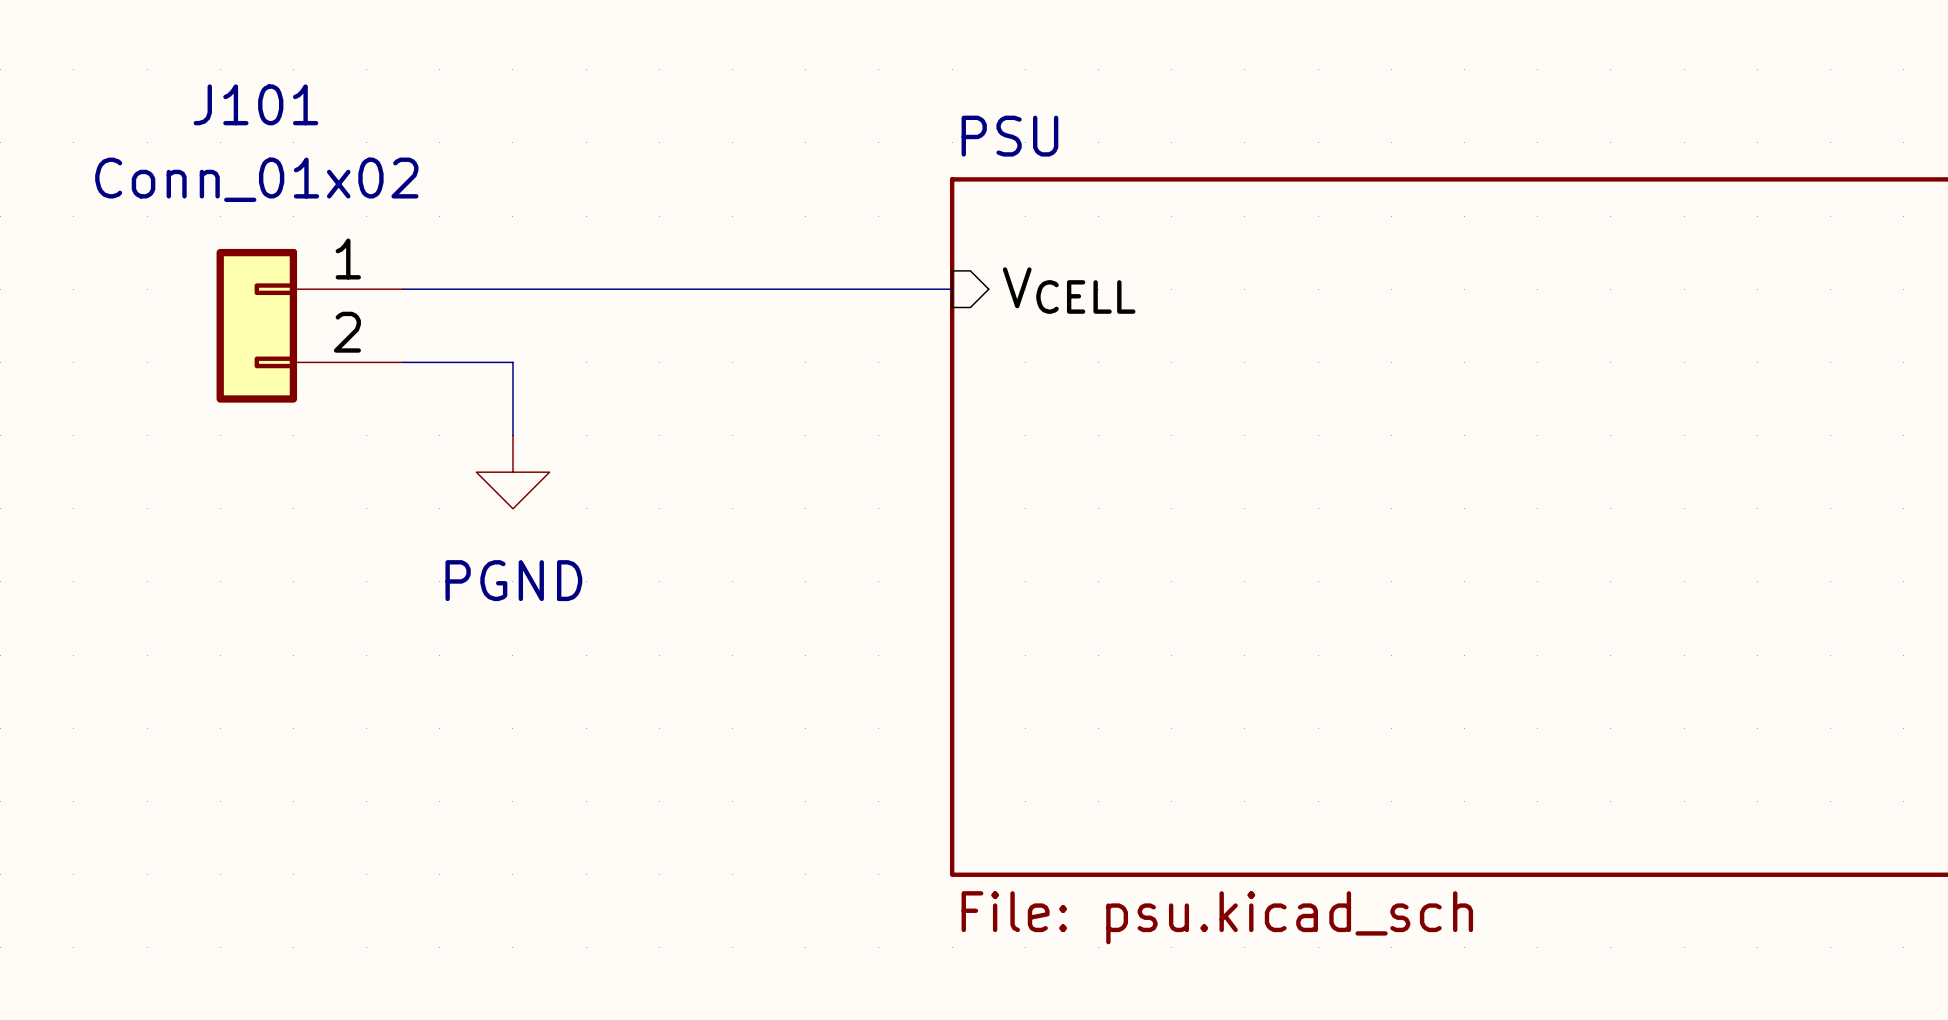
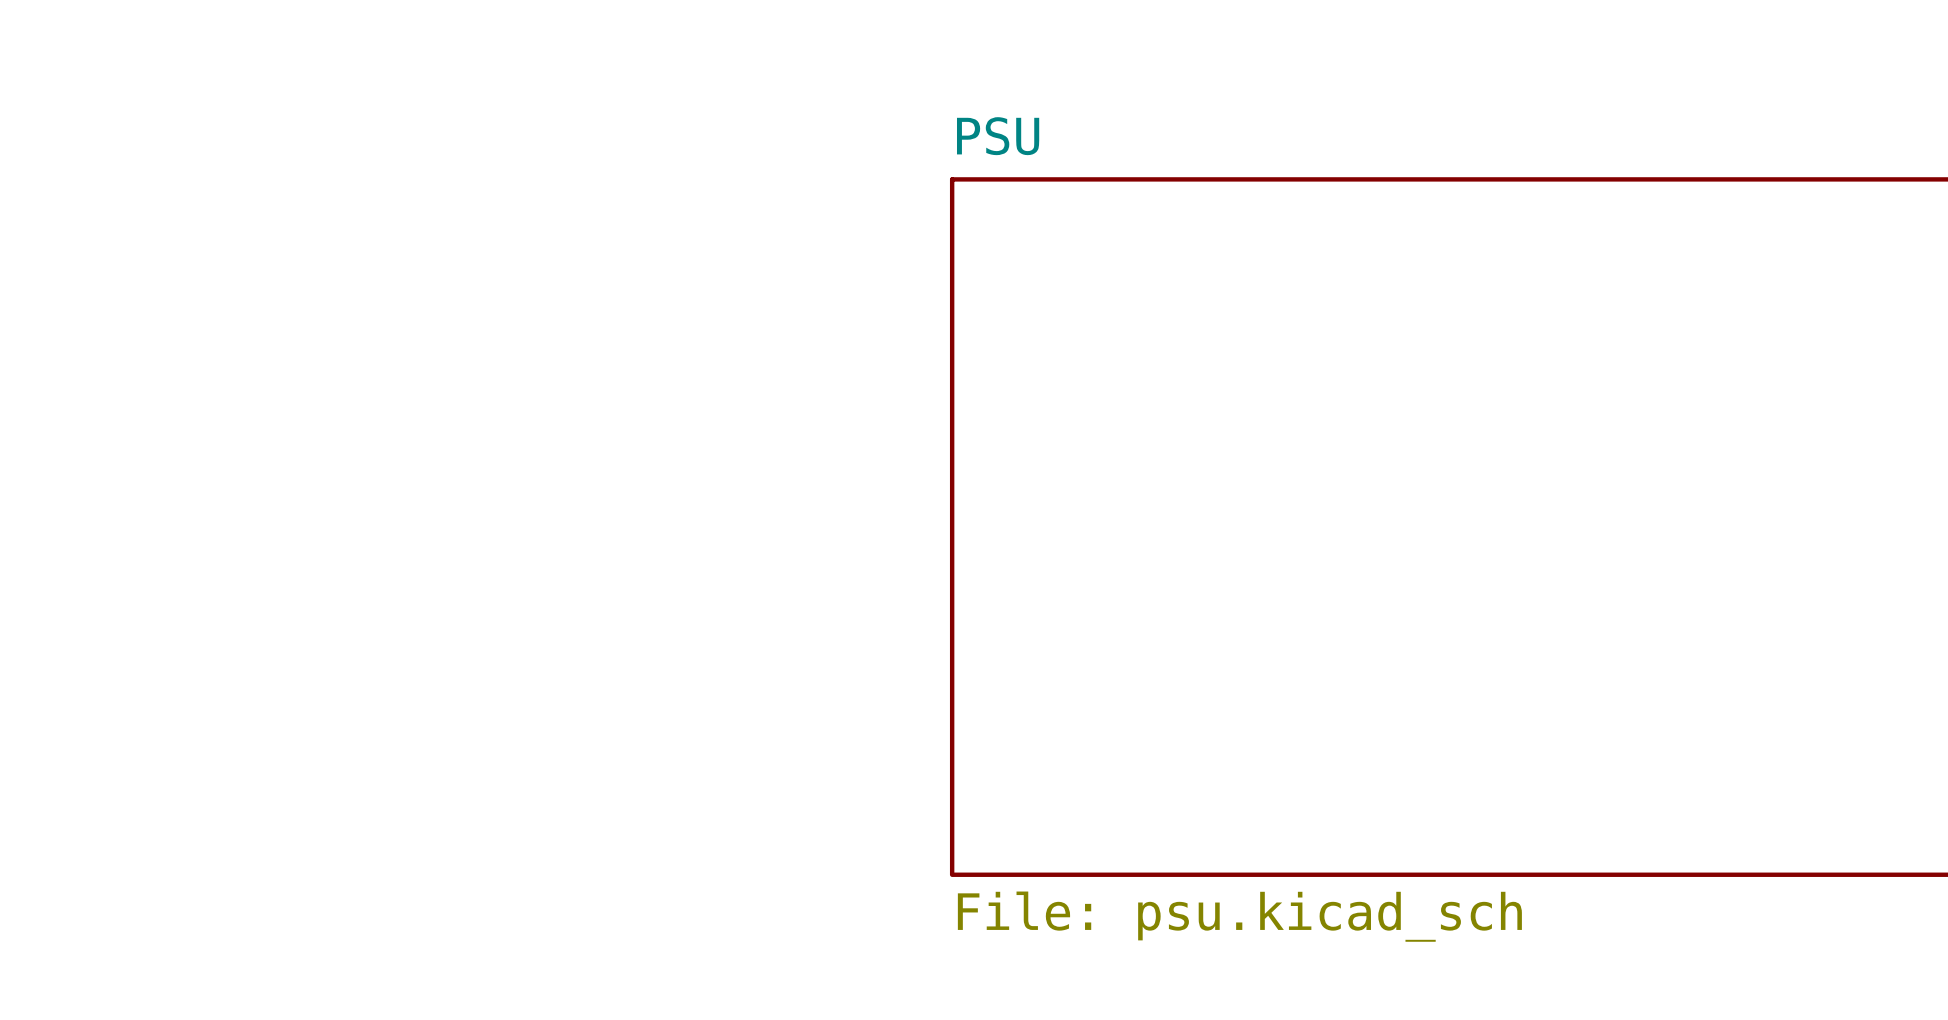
wire: (403, 289) (952, 289) -> none
sheet pin: VCELL (1069, 290) -> none
J101: Conn_01x02 (309, 325) -> none
wire: (403, 362) (512, 362) (512, 435) -> none
power symbol: PGND (512, 472) -> none

